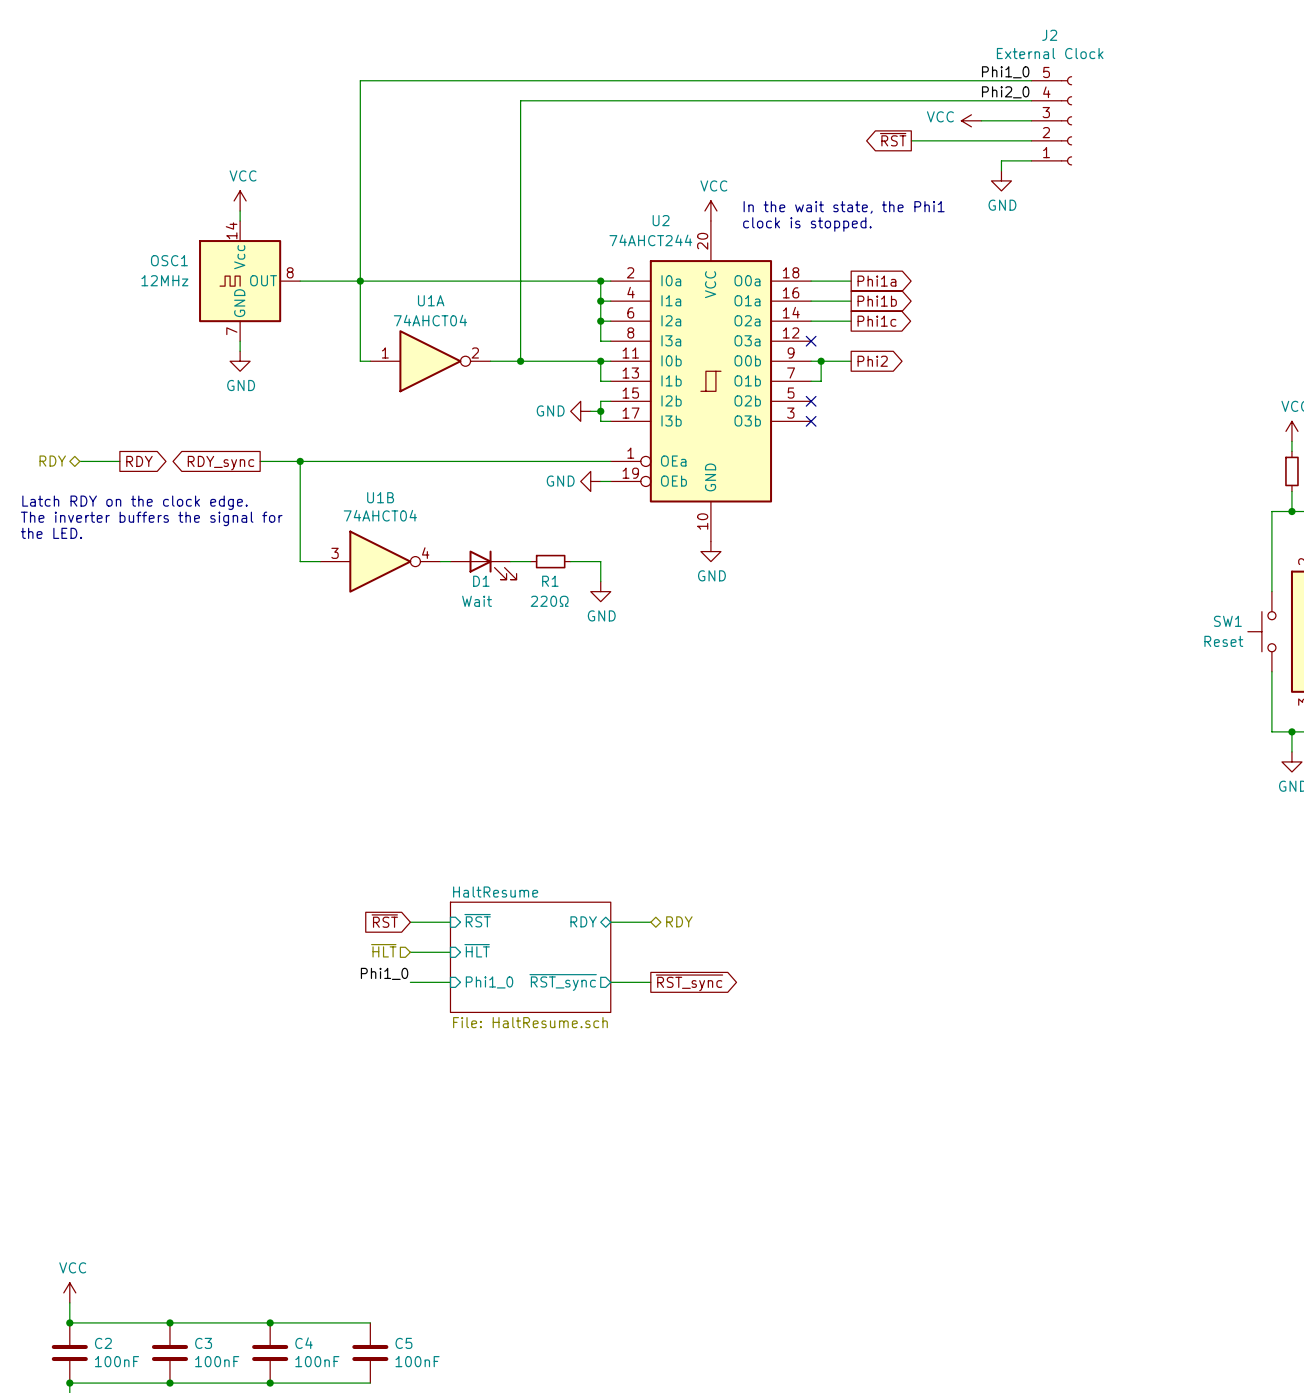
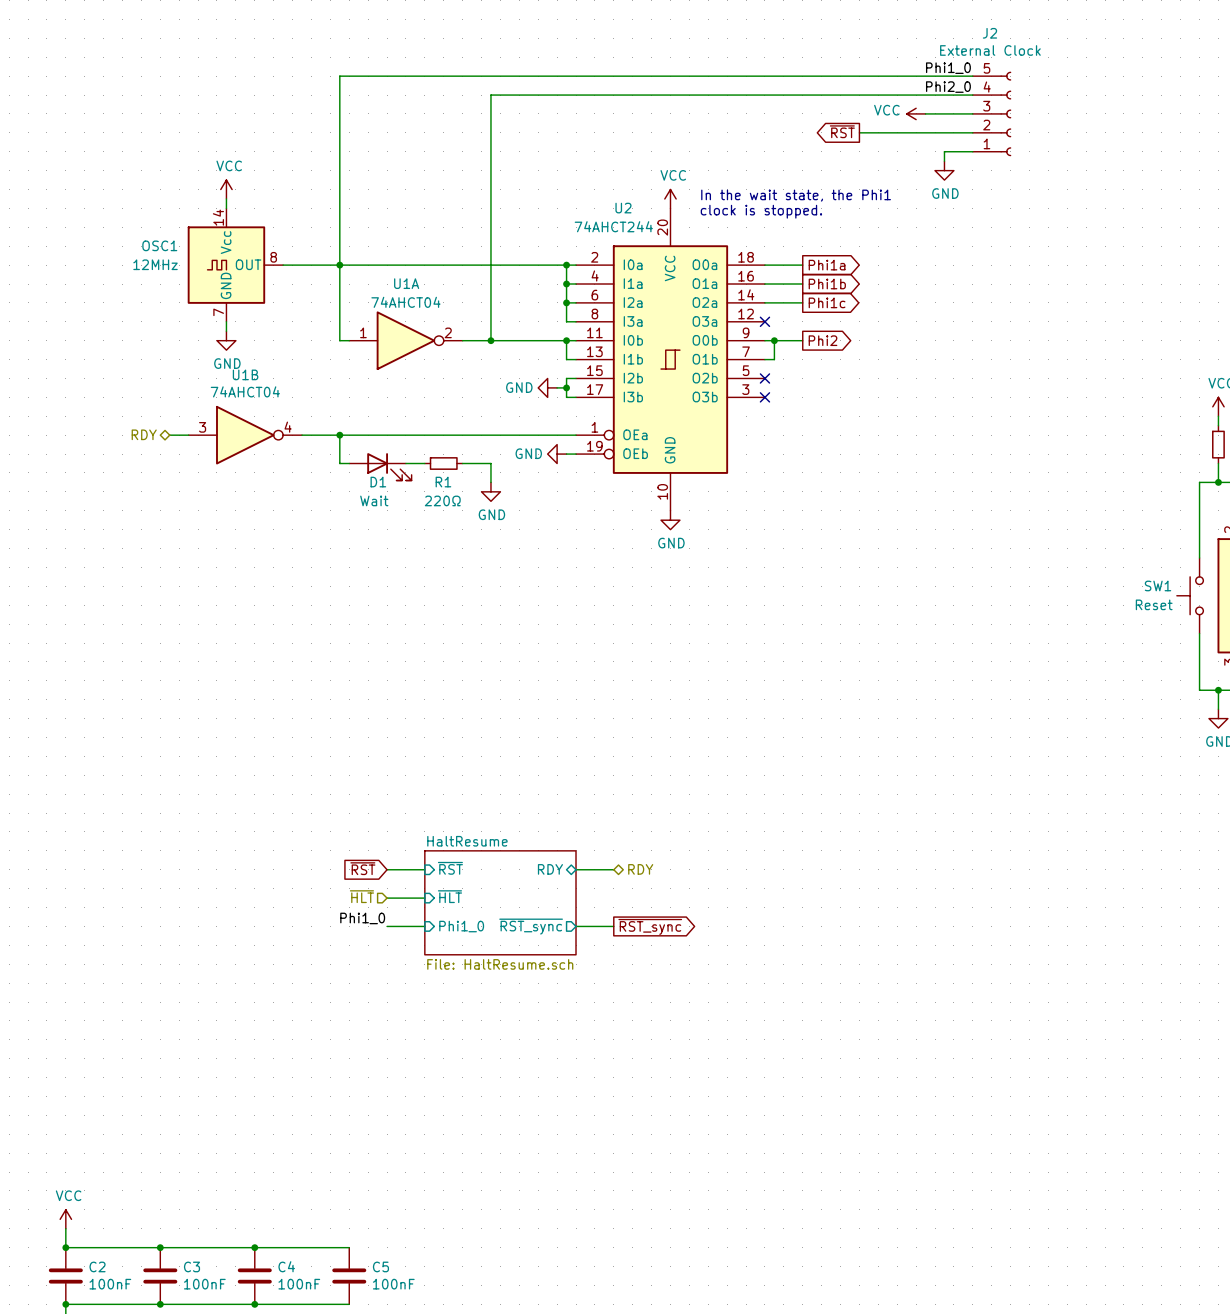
hierarchical label position: RDY (52, 461) -> RDY (144, 434)
wire: (79, 461) (119, 461) -> none
global label: RDY (139, 461) -> none
wire: none -> (169, 435) (188, 435)
wire: (300, 461) (300, 561) (320, 561) -> none
junction: (300, 461) -> none
wire: none -> (339, 435) (339, 463) (349, 463)
junction: none -> (339, 435)
global label: RDY_sync (221, 463) -> none
text: Latch RDY on the clock edge. (134, 502) -> none
text: The inverter buffers the signal for (151, 518) -> none
text: the LED. (51, 533) -> none
U1B position: (380, 561) -> (245, 435)
wire: (440, 561) (450, 561) -> none
wire: (510, 561) (530, 561) -> (405, 463) (424, 463)
R1 position: (550, 561) -> (443, 463)
wire: (570, 561) (600, 561) (600, 581) -> (462, 463) (490, 463) (490, 482)
D1 position: (483, 565) -> (380, 466)
power symbol position: GND (600, 591) -> GND (490, 491)

